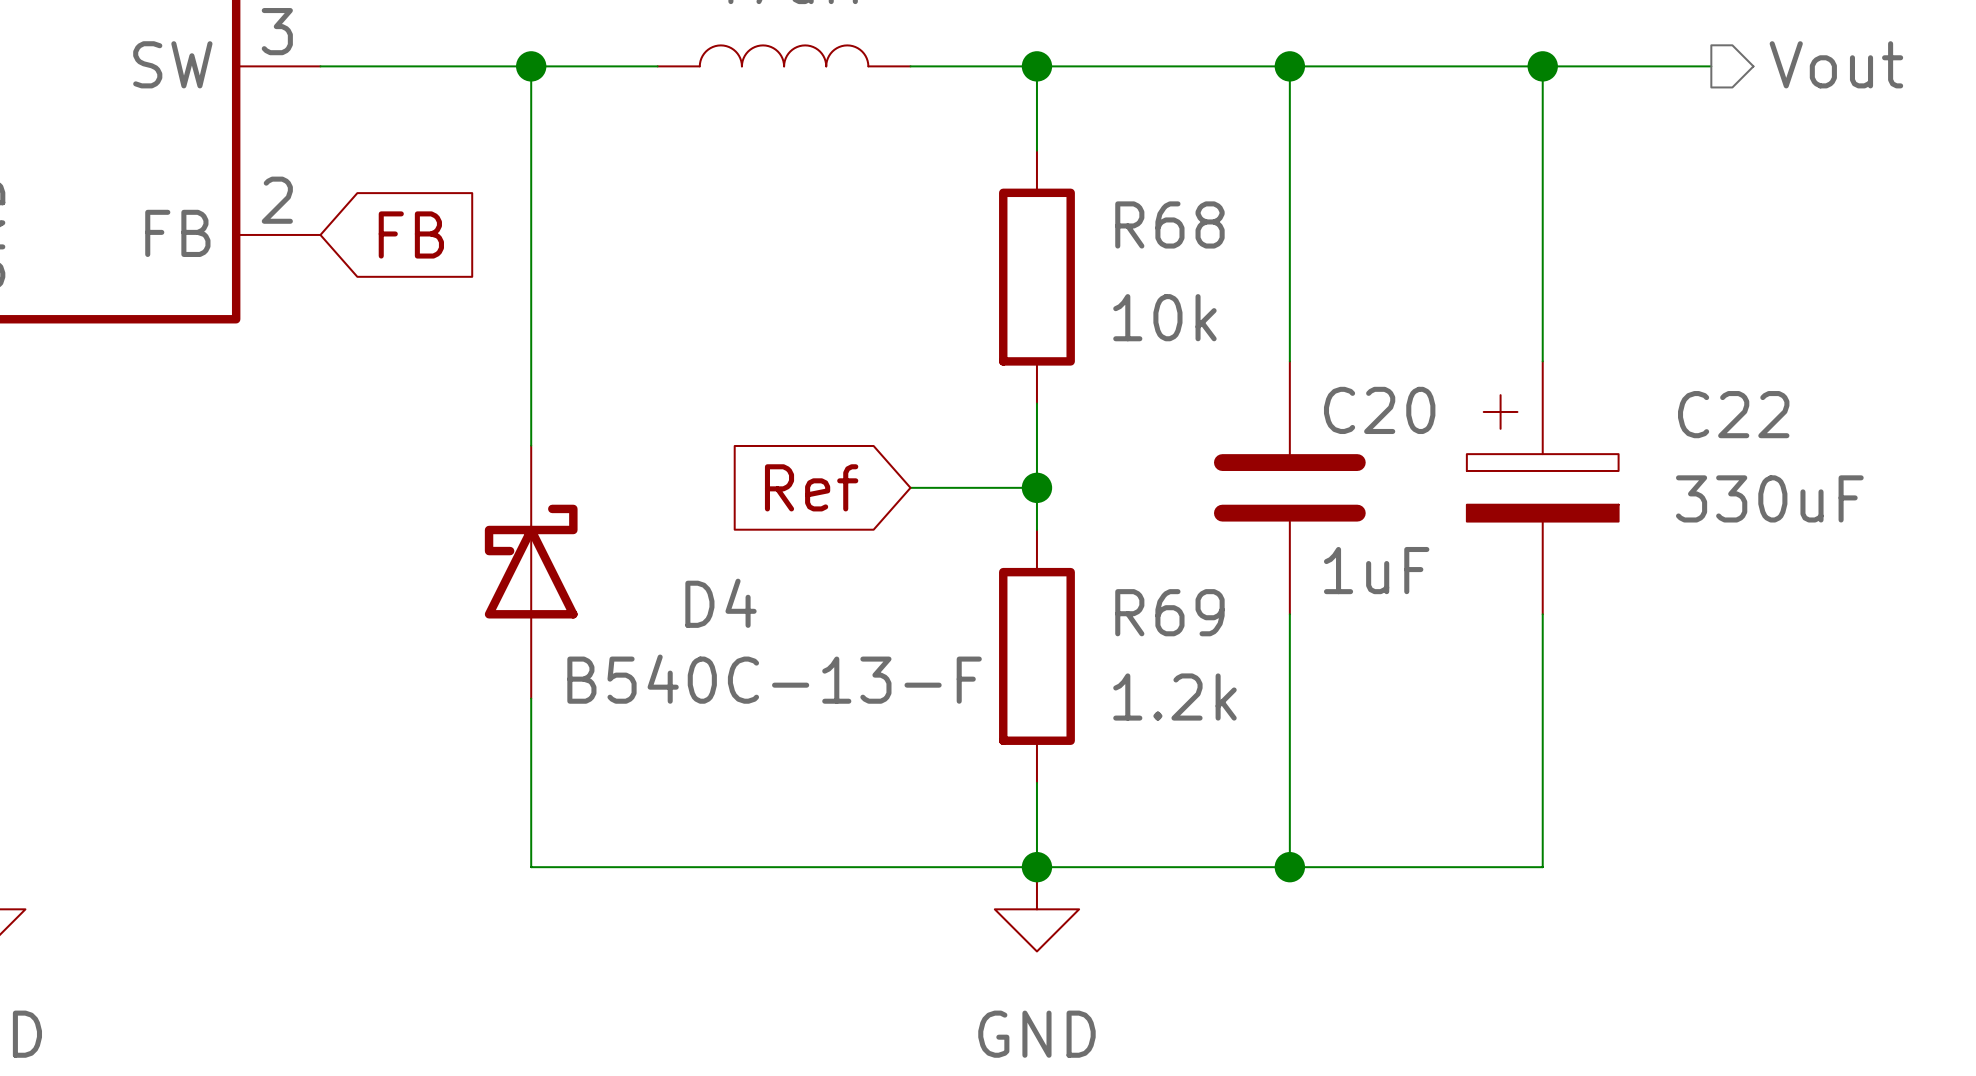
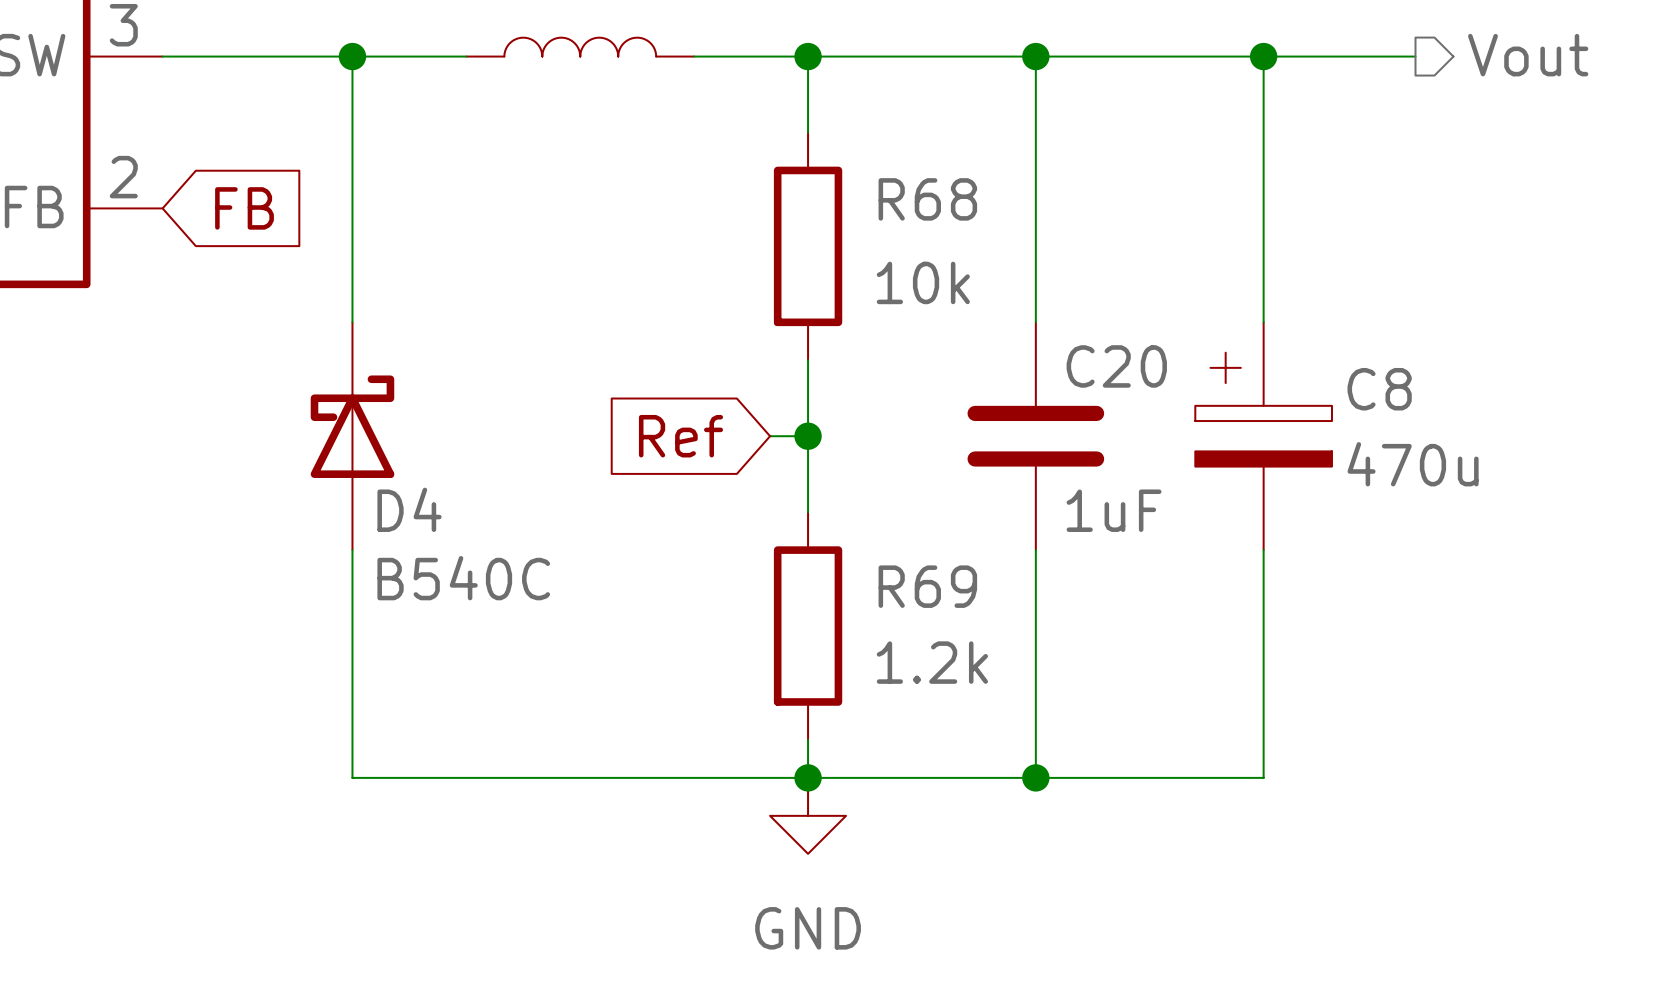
C22 name: C22 (1733, 414) -> C8 (1379, 389)
global label position: Ref (811, 487) -> Ref (680, 436)
wire: (910, 487) (994, 487) -> none
C22 value: 330uF (1769, 498) -> 470u (1413, 464)
D4 position: (531, 572) -> (352, 436)
D4 name position: D4 (720, 603) -> D4 (409, 509)
R69 position: (1036, 656) -> (808, 626)
D4 value: B540C-13-F (774, 679) -> B540C (463, 578)

